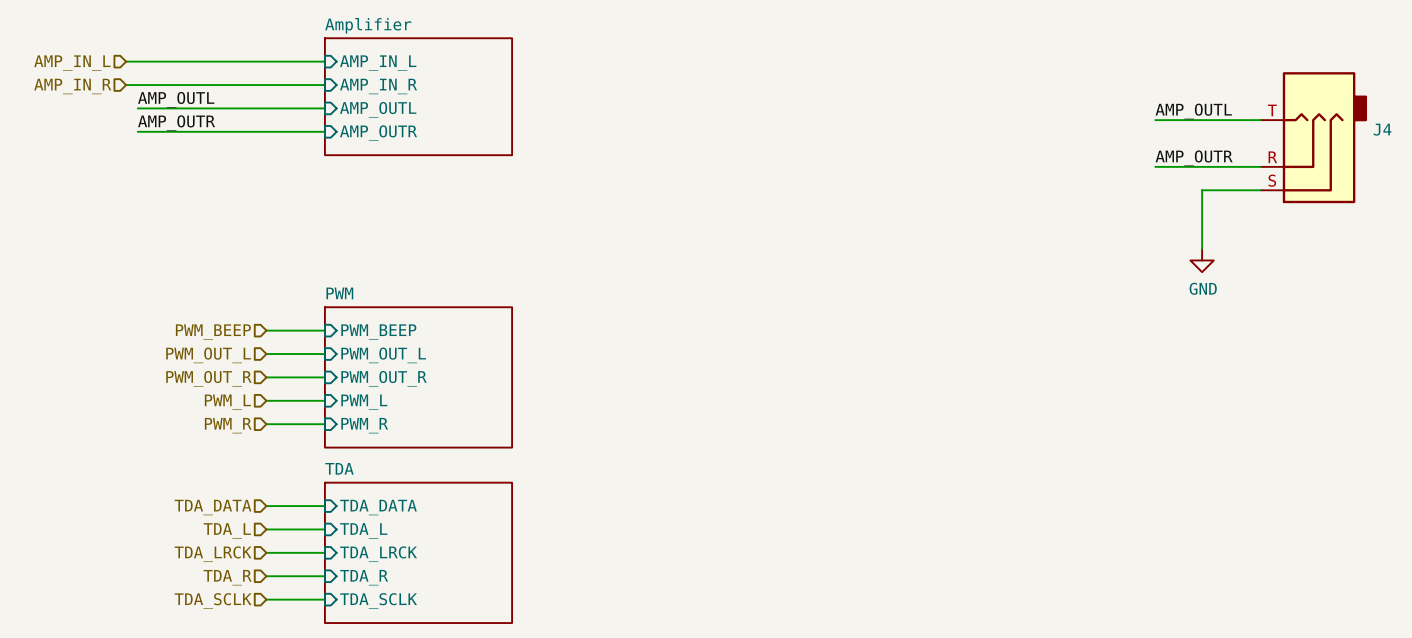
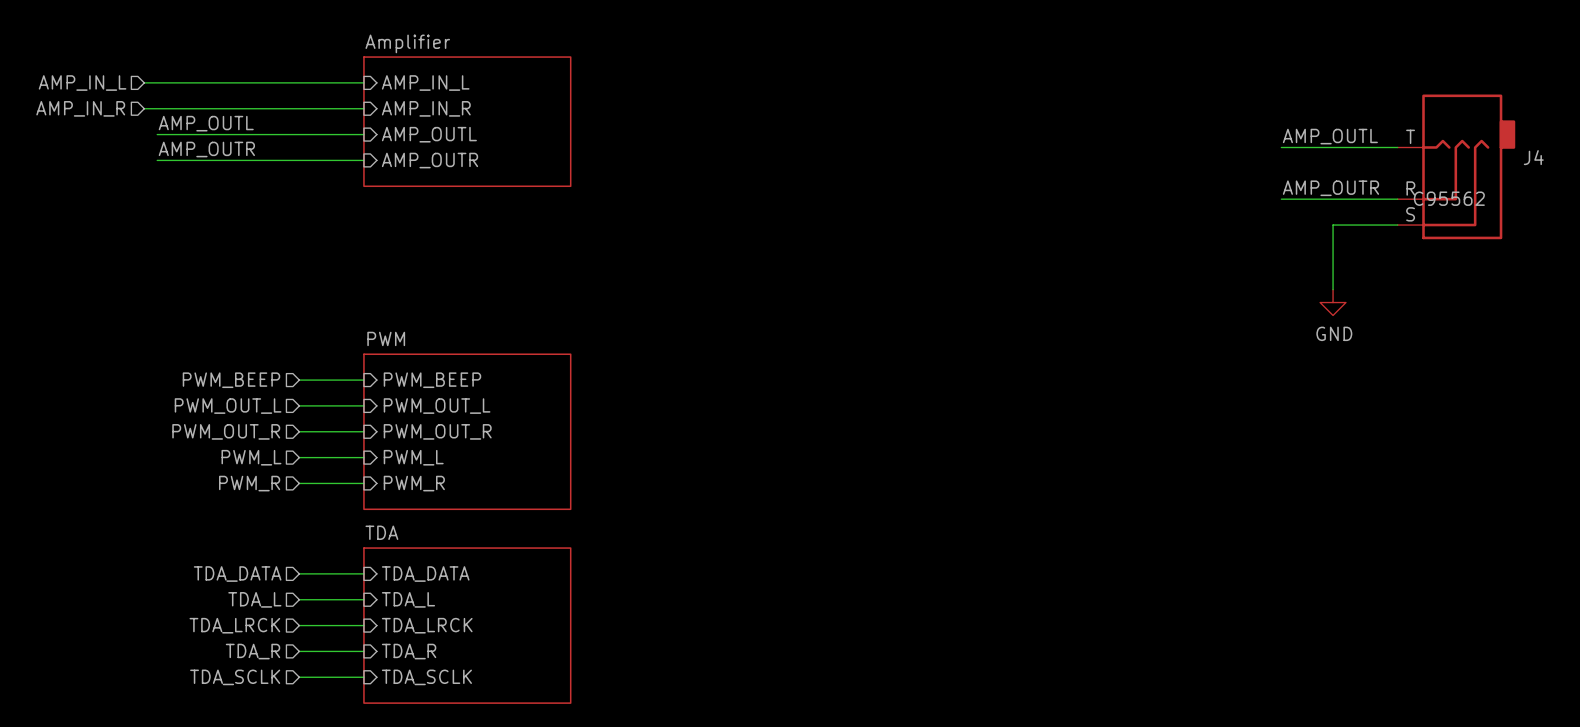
J4 text: none -> C95562 (1449, 198)

